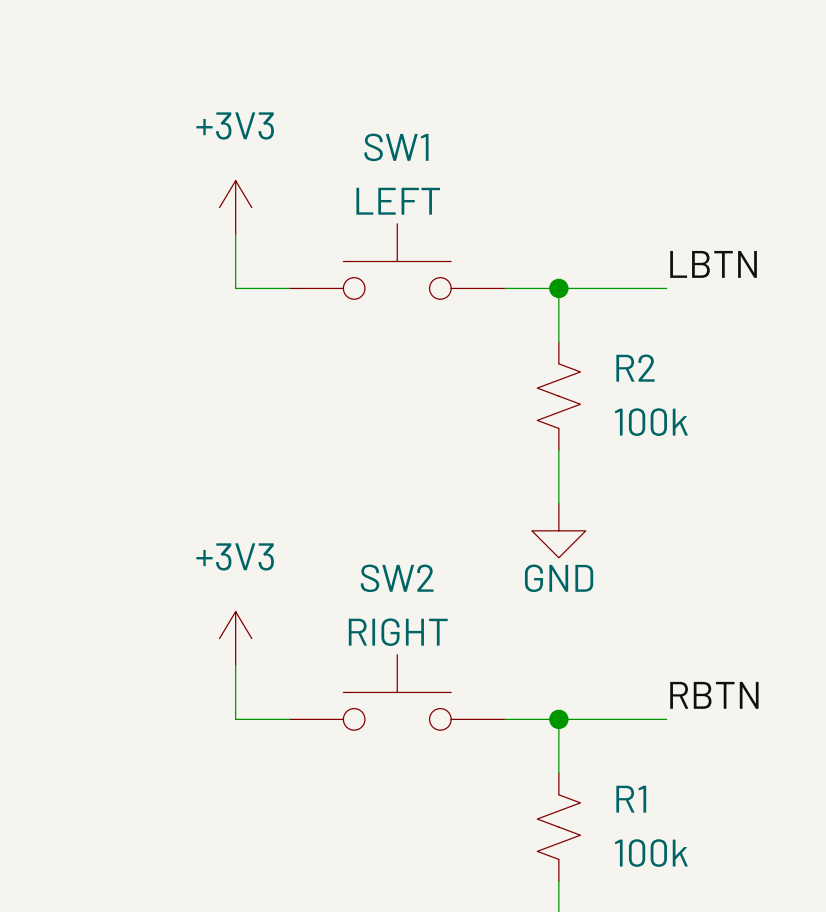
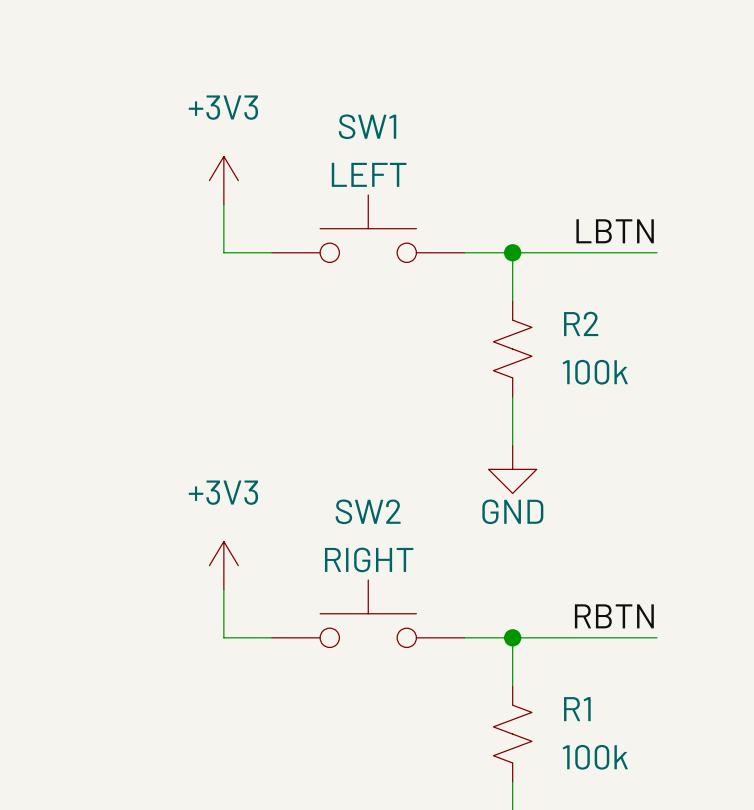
label position: LBTN (713, 264) -> LBTN (615, 231)
wire: none -> (608, 252) (657, 252)
label position: RBTN (714, 695) -> RBTN (614, 616)
wire: none -> (608, 637) (657, 637)

